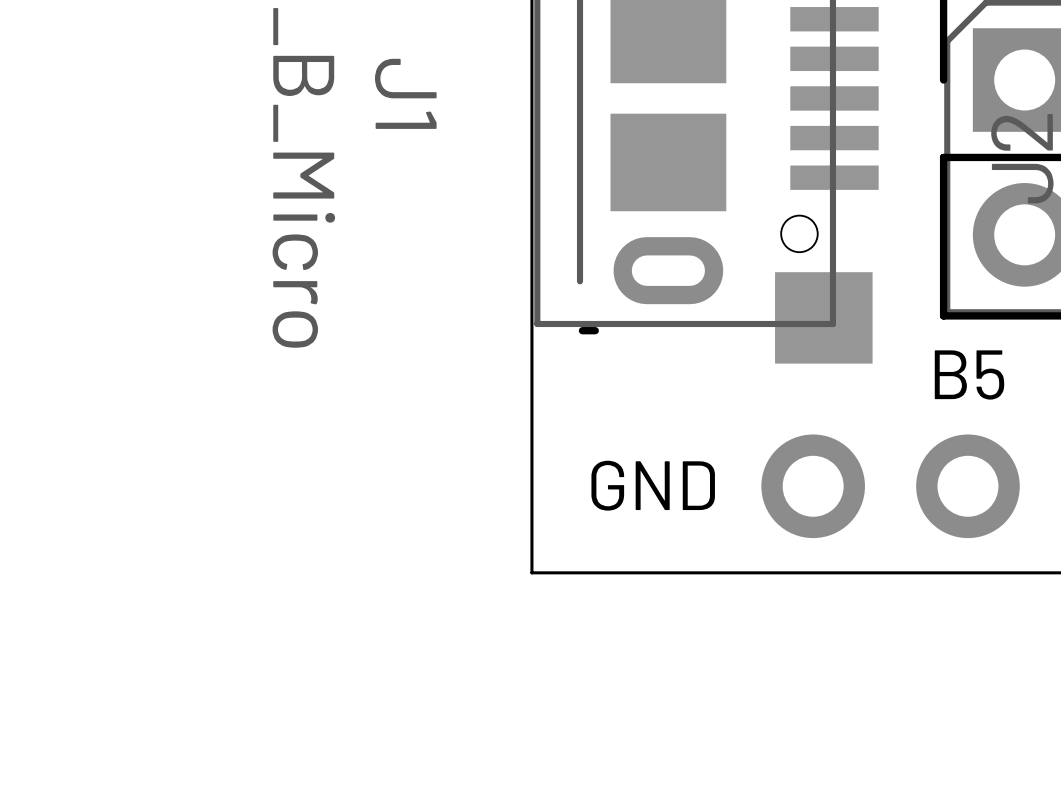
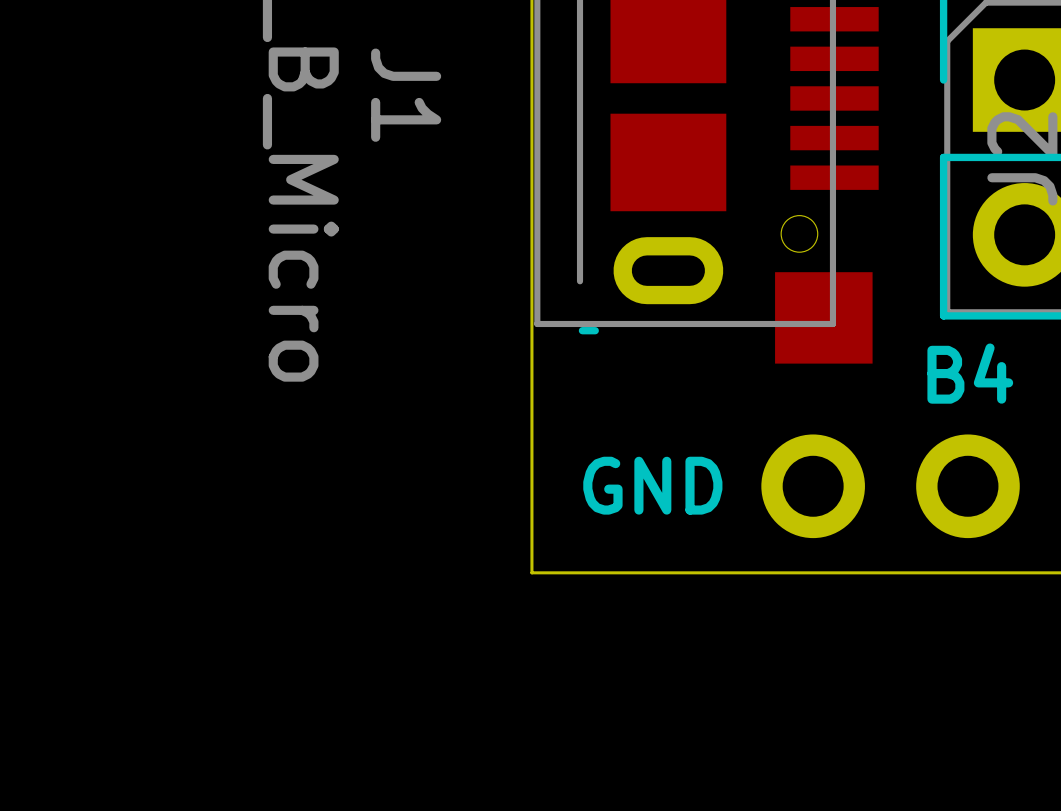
text: B5 (969, 374) -> B4 (970, 373)

